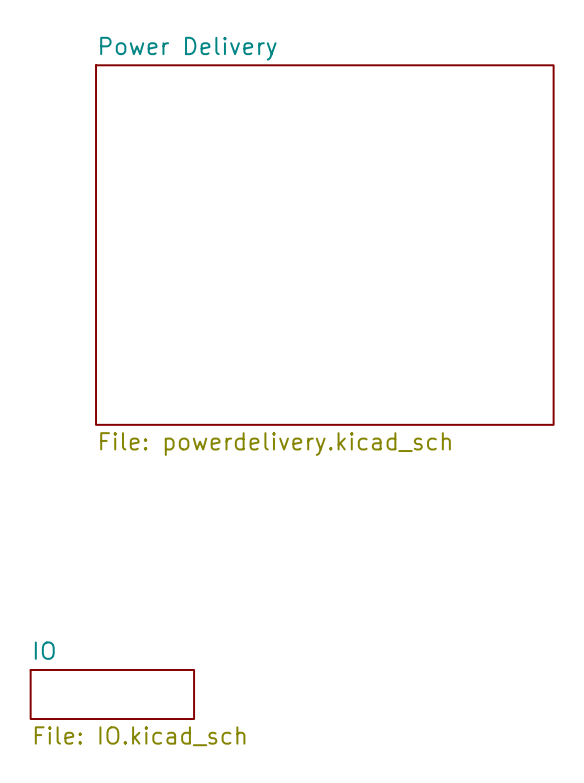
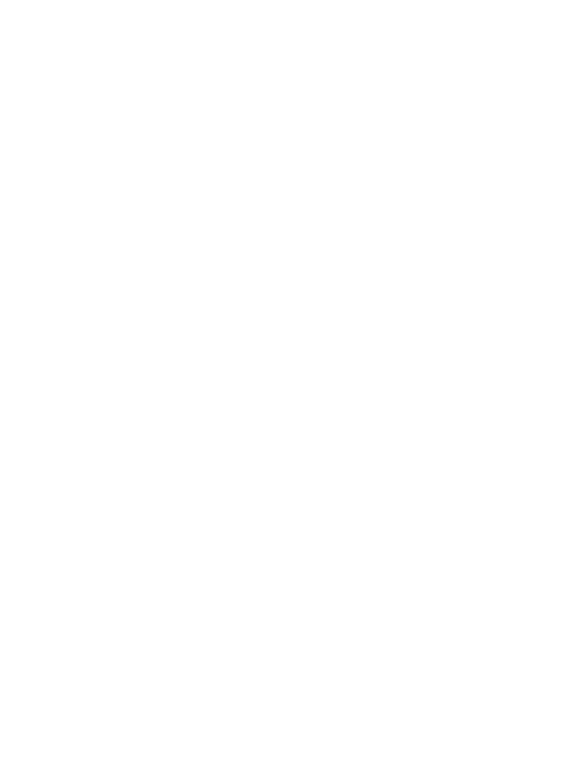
sheet Power Delivery: File: powerdelivery.kicad_sch (324, 245) -> none
sheet IO: File: IO.kicad_sch (112, 694) -> none

